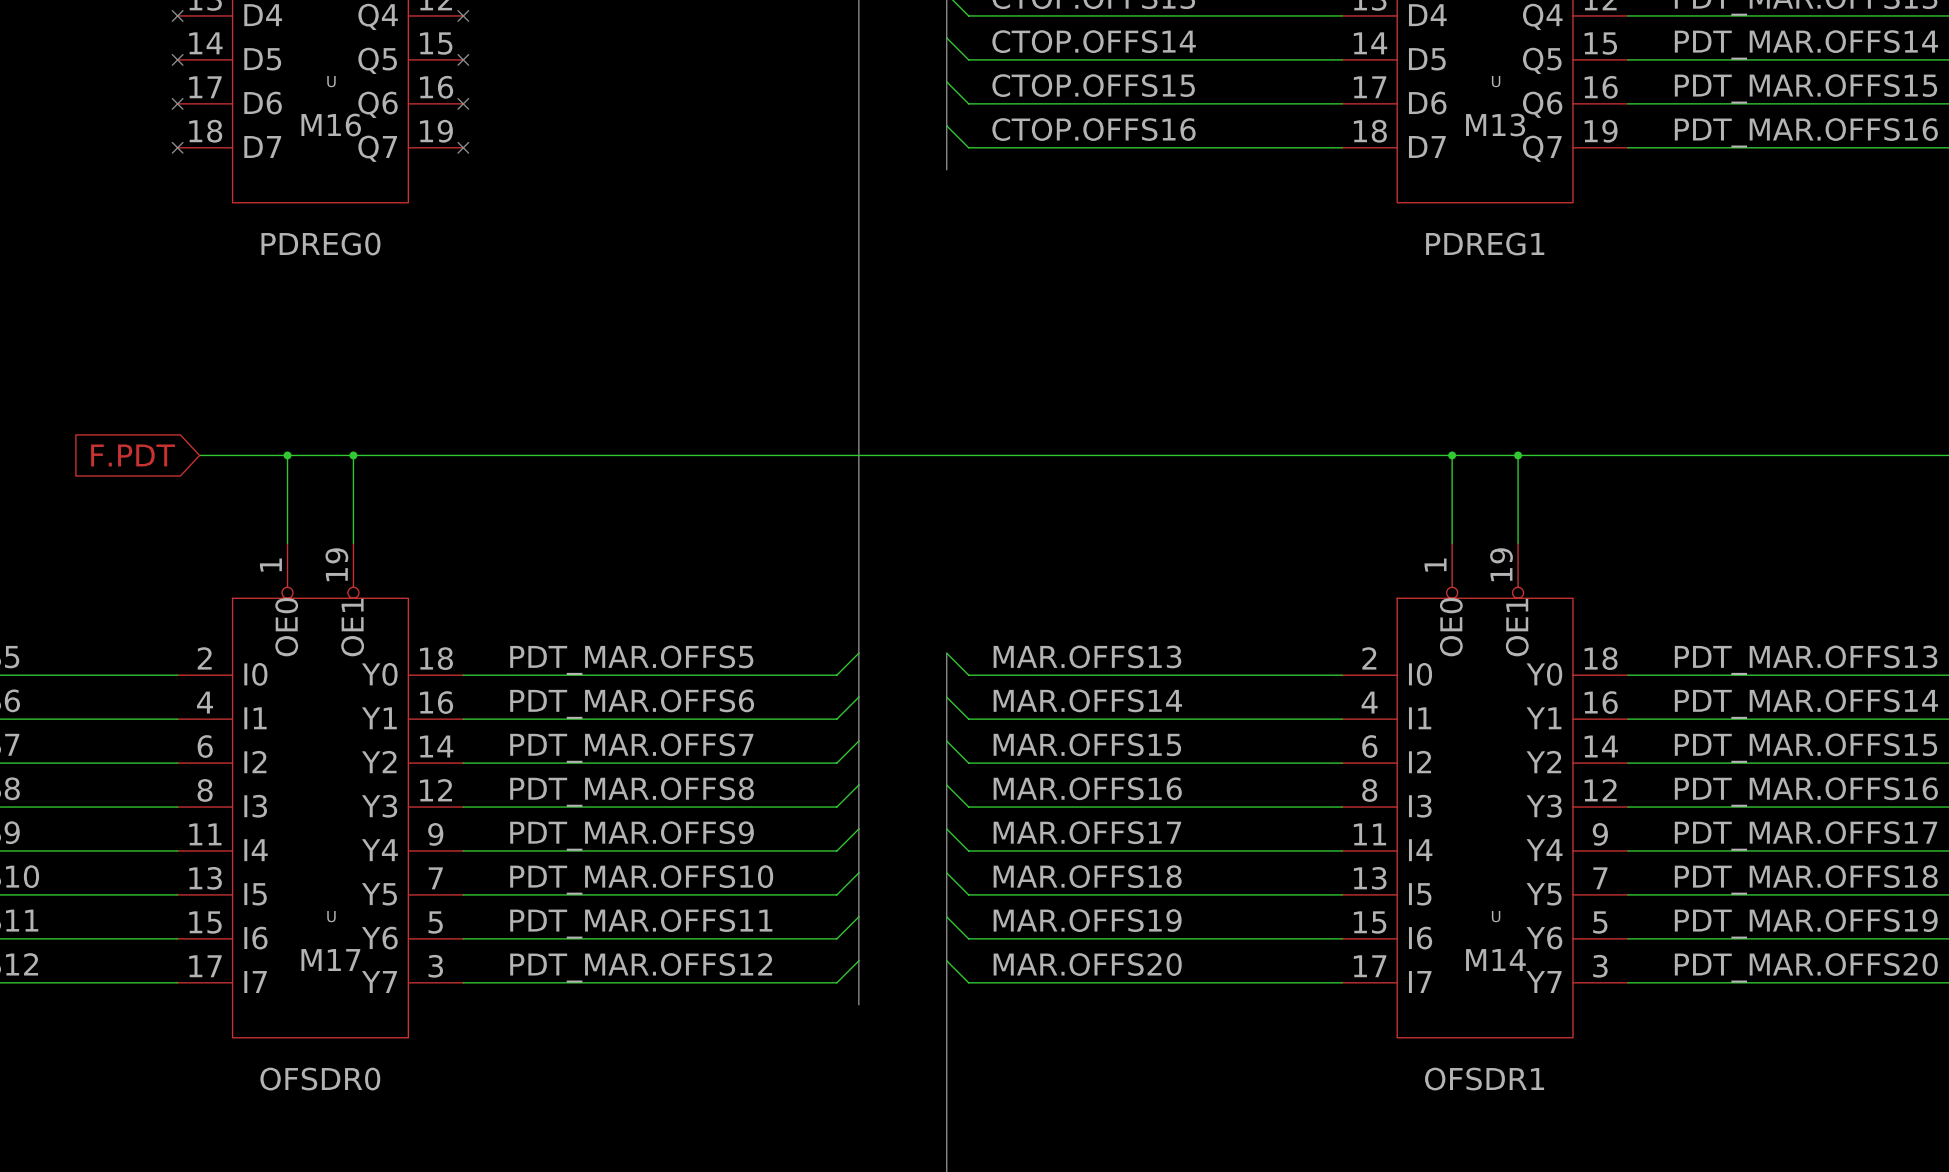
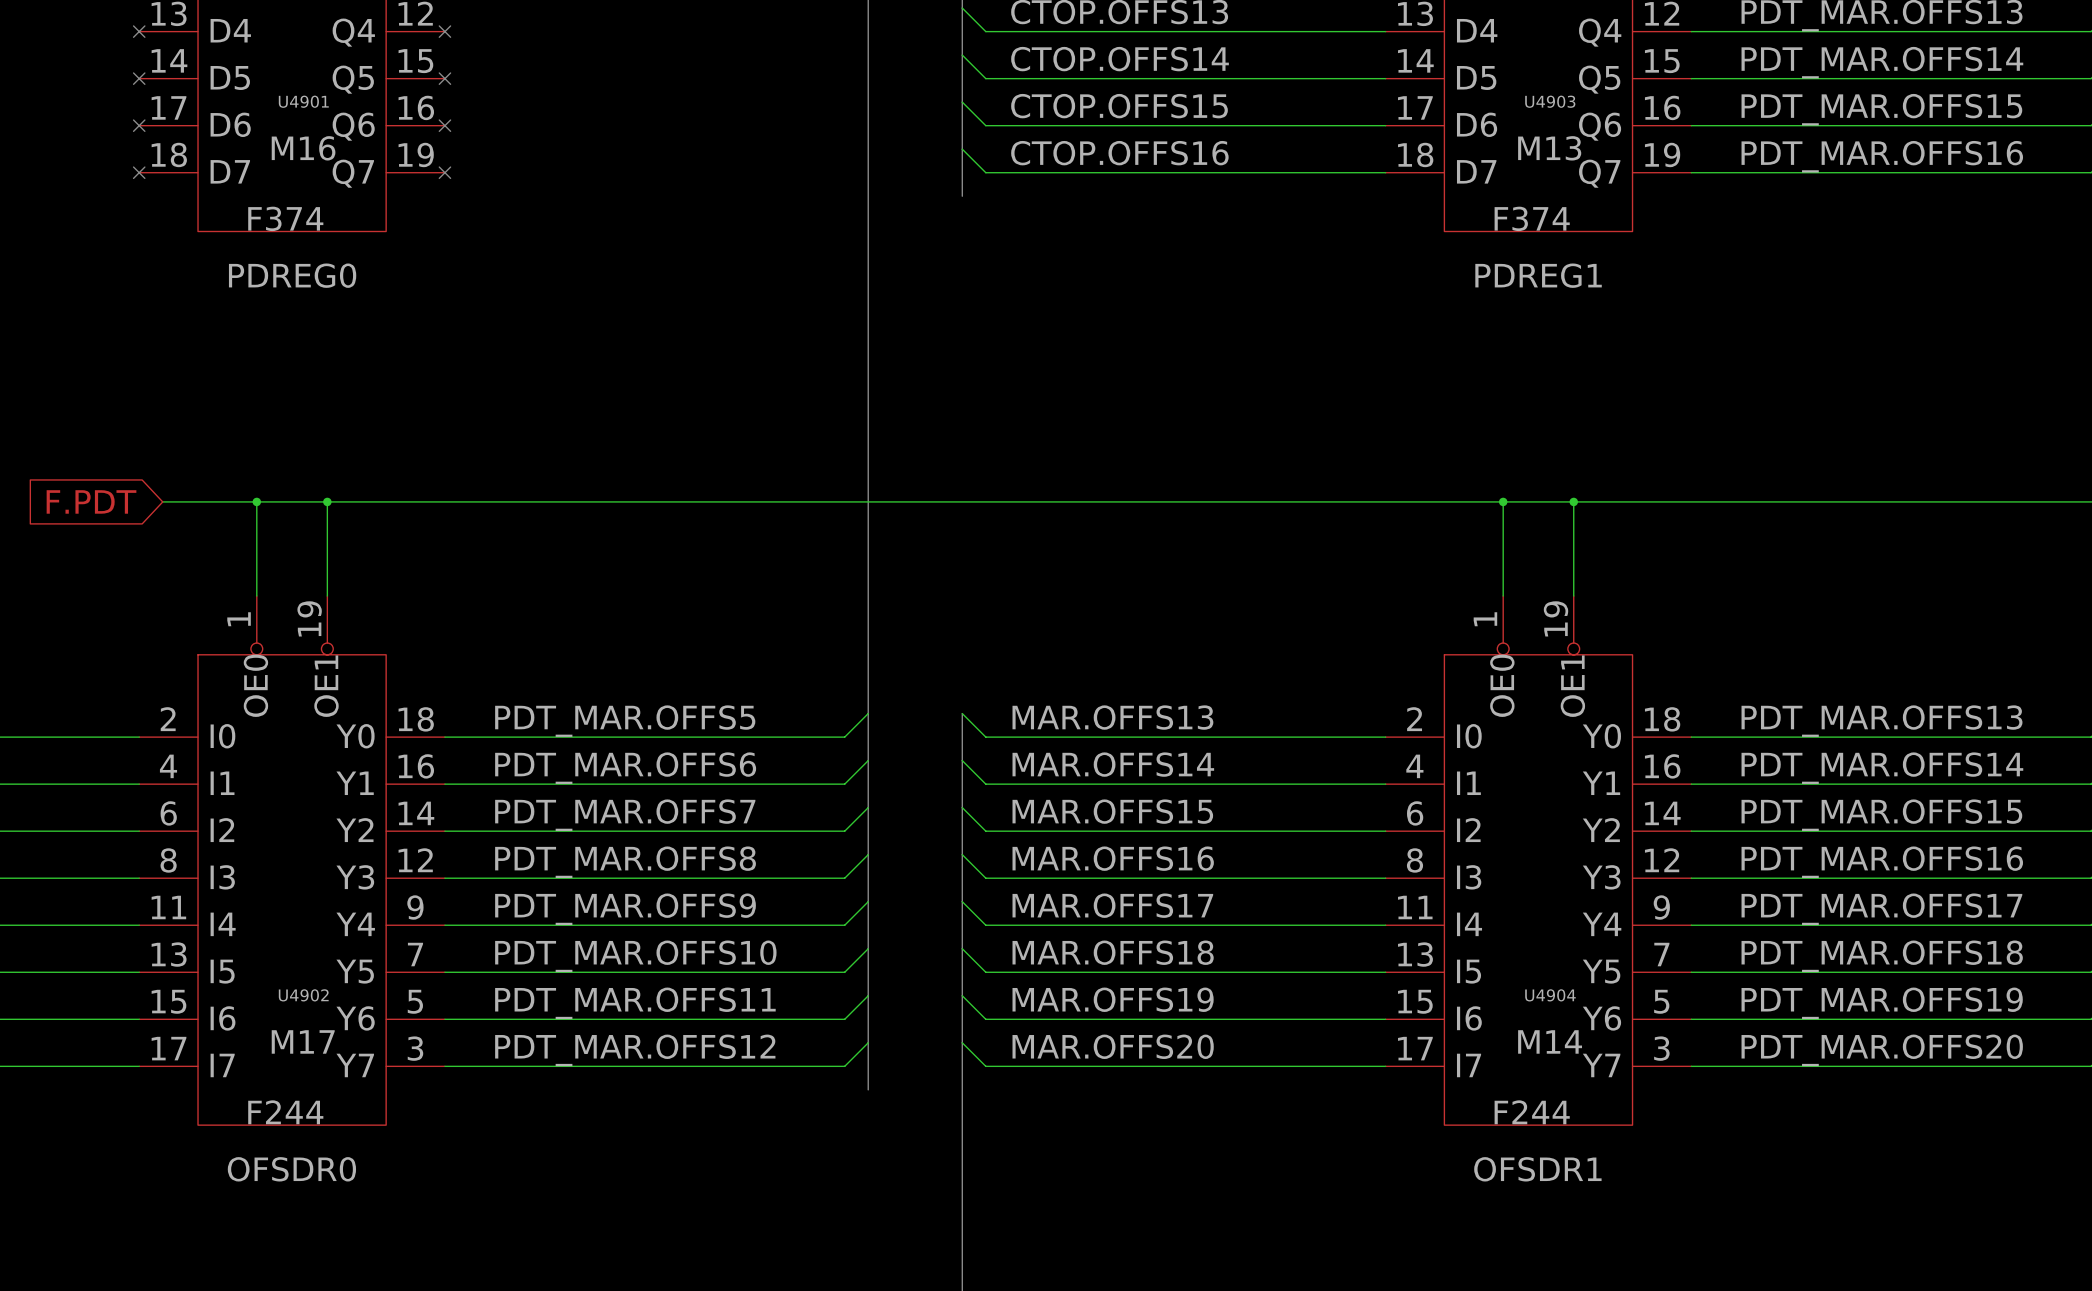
U name: U (331, 81) -> U4901 (303, 101)
U name: U (1496, 81) -> U4903 (1550, 101)
U value: none -> F374 (285, 218)
U value: none -> F374 (1532, 218)
U name: U (331, 916) -> U4902 (303, 995)
U name: U (1496, 916) -> U4904 (1550, 995)
U value: none -> F244 (285, 1112)
U value: none -> F244 (1532, 1112)

